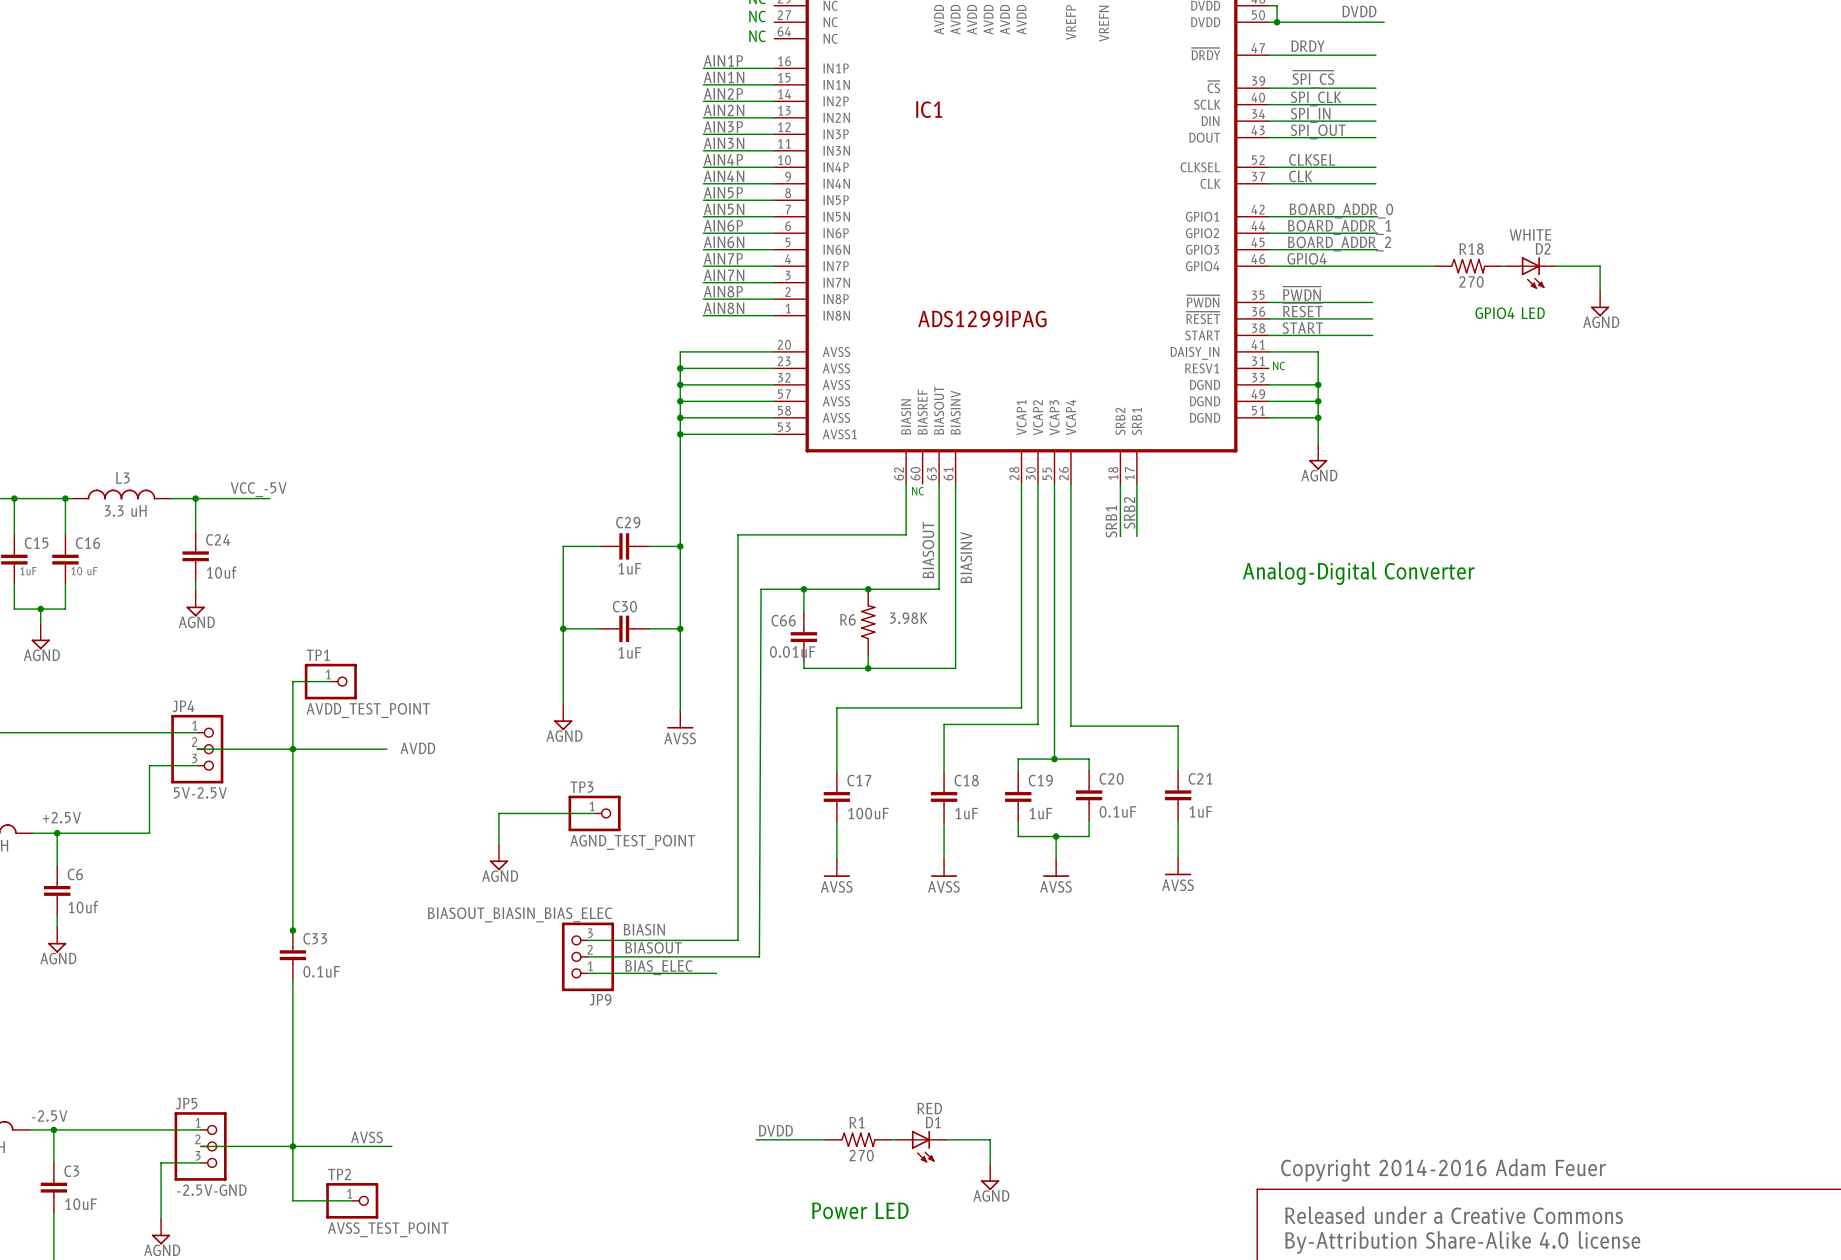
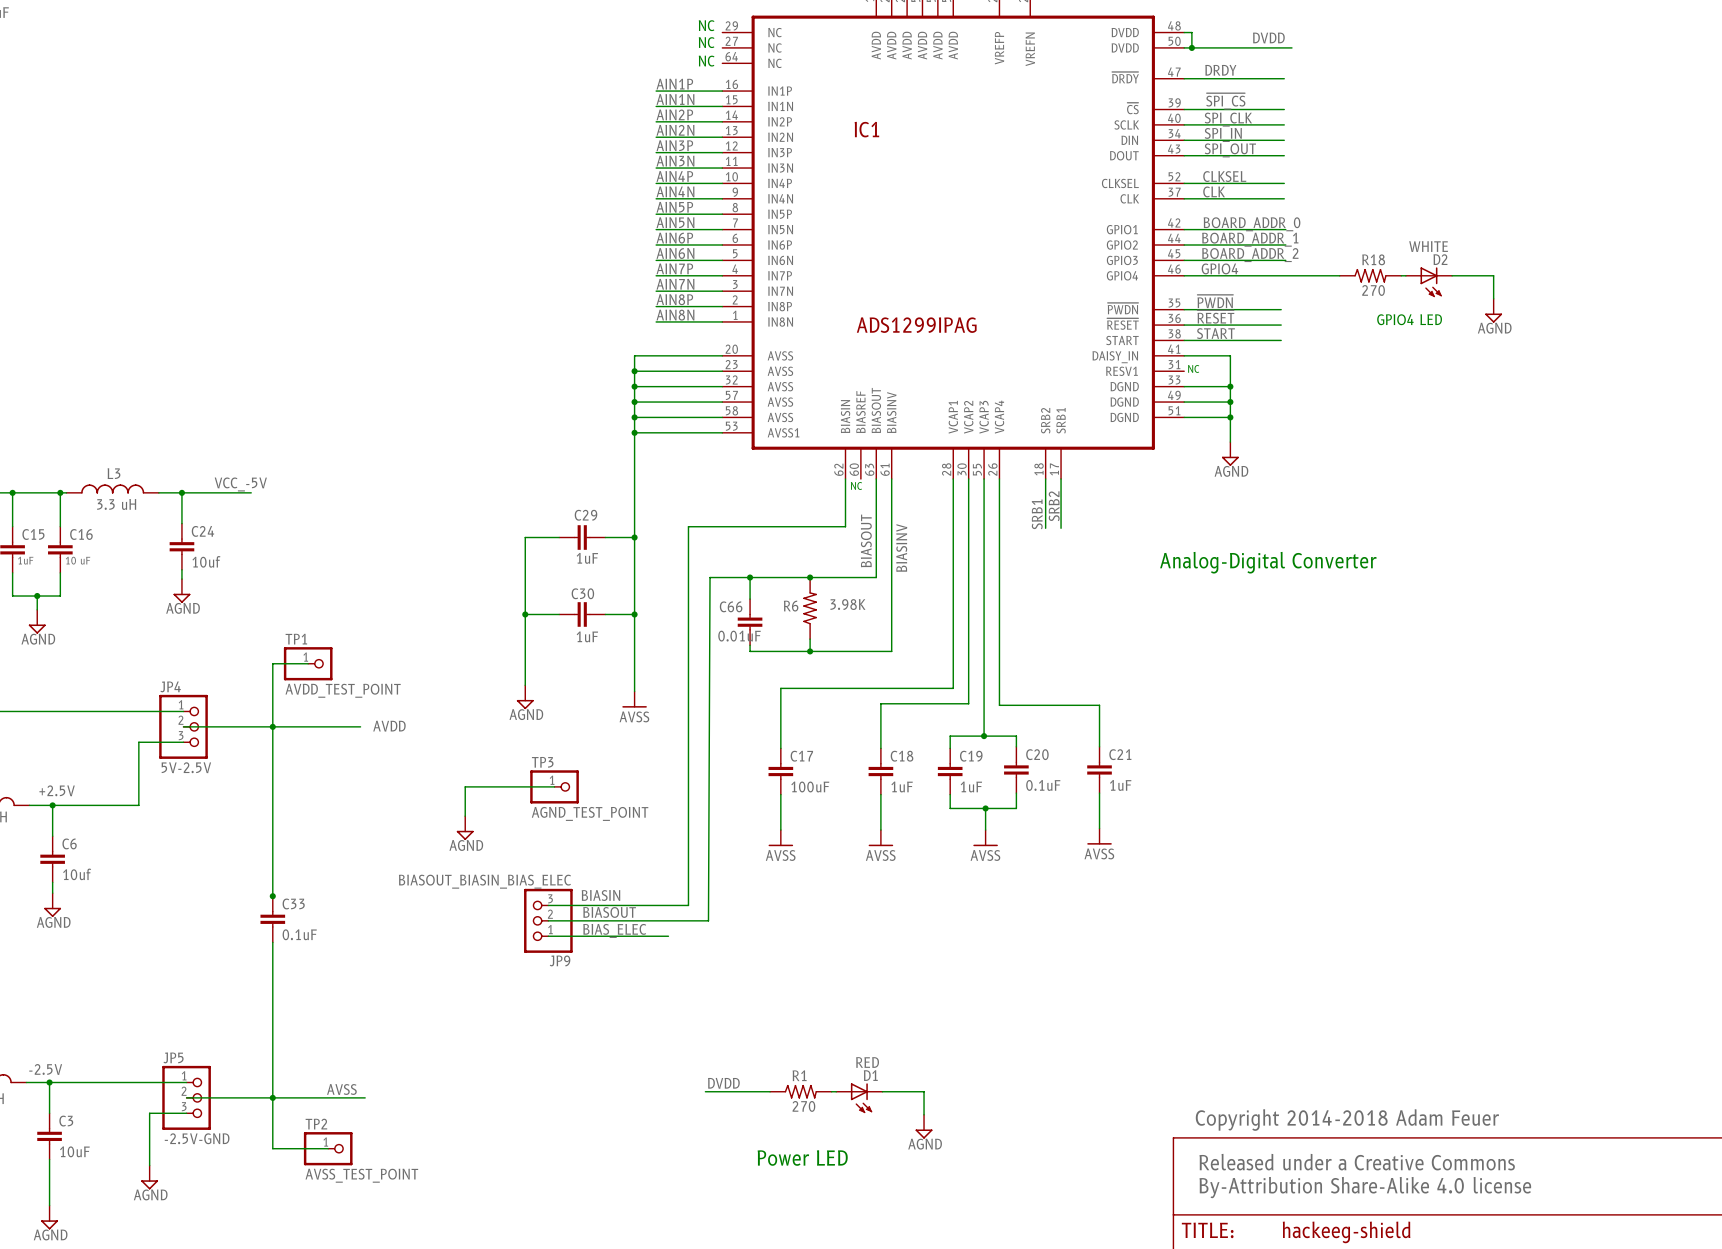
text: Copyright 2014-2016 Adam Feuer (1443, 1170) -> Copyright 2014-2018 Adam Feuer (1347, 1120)

